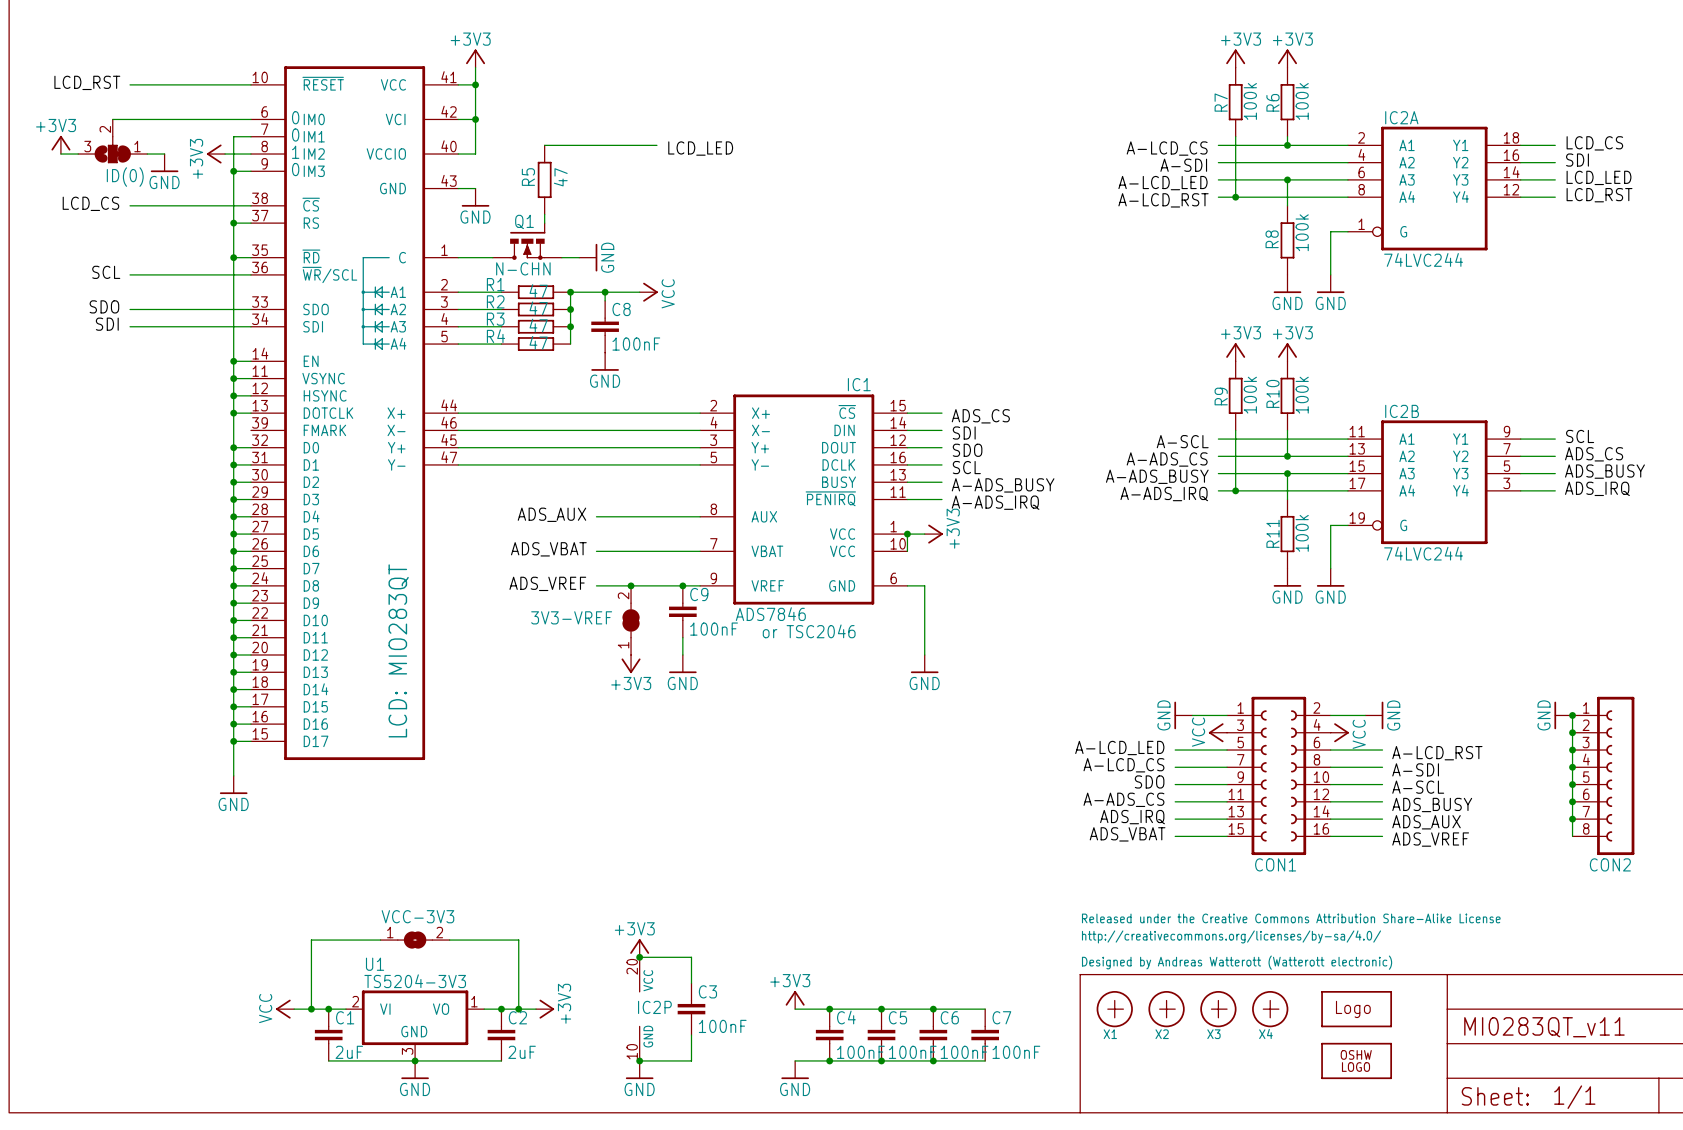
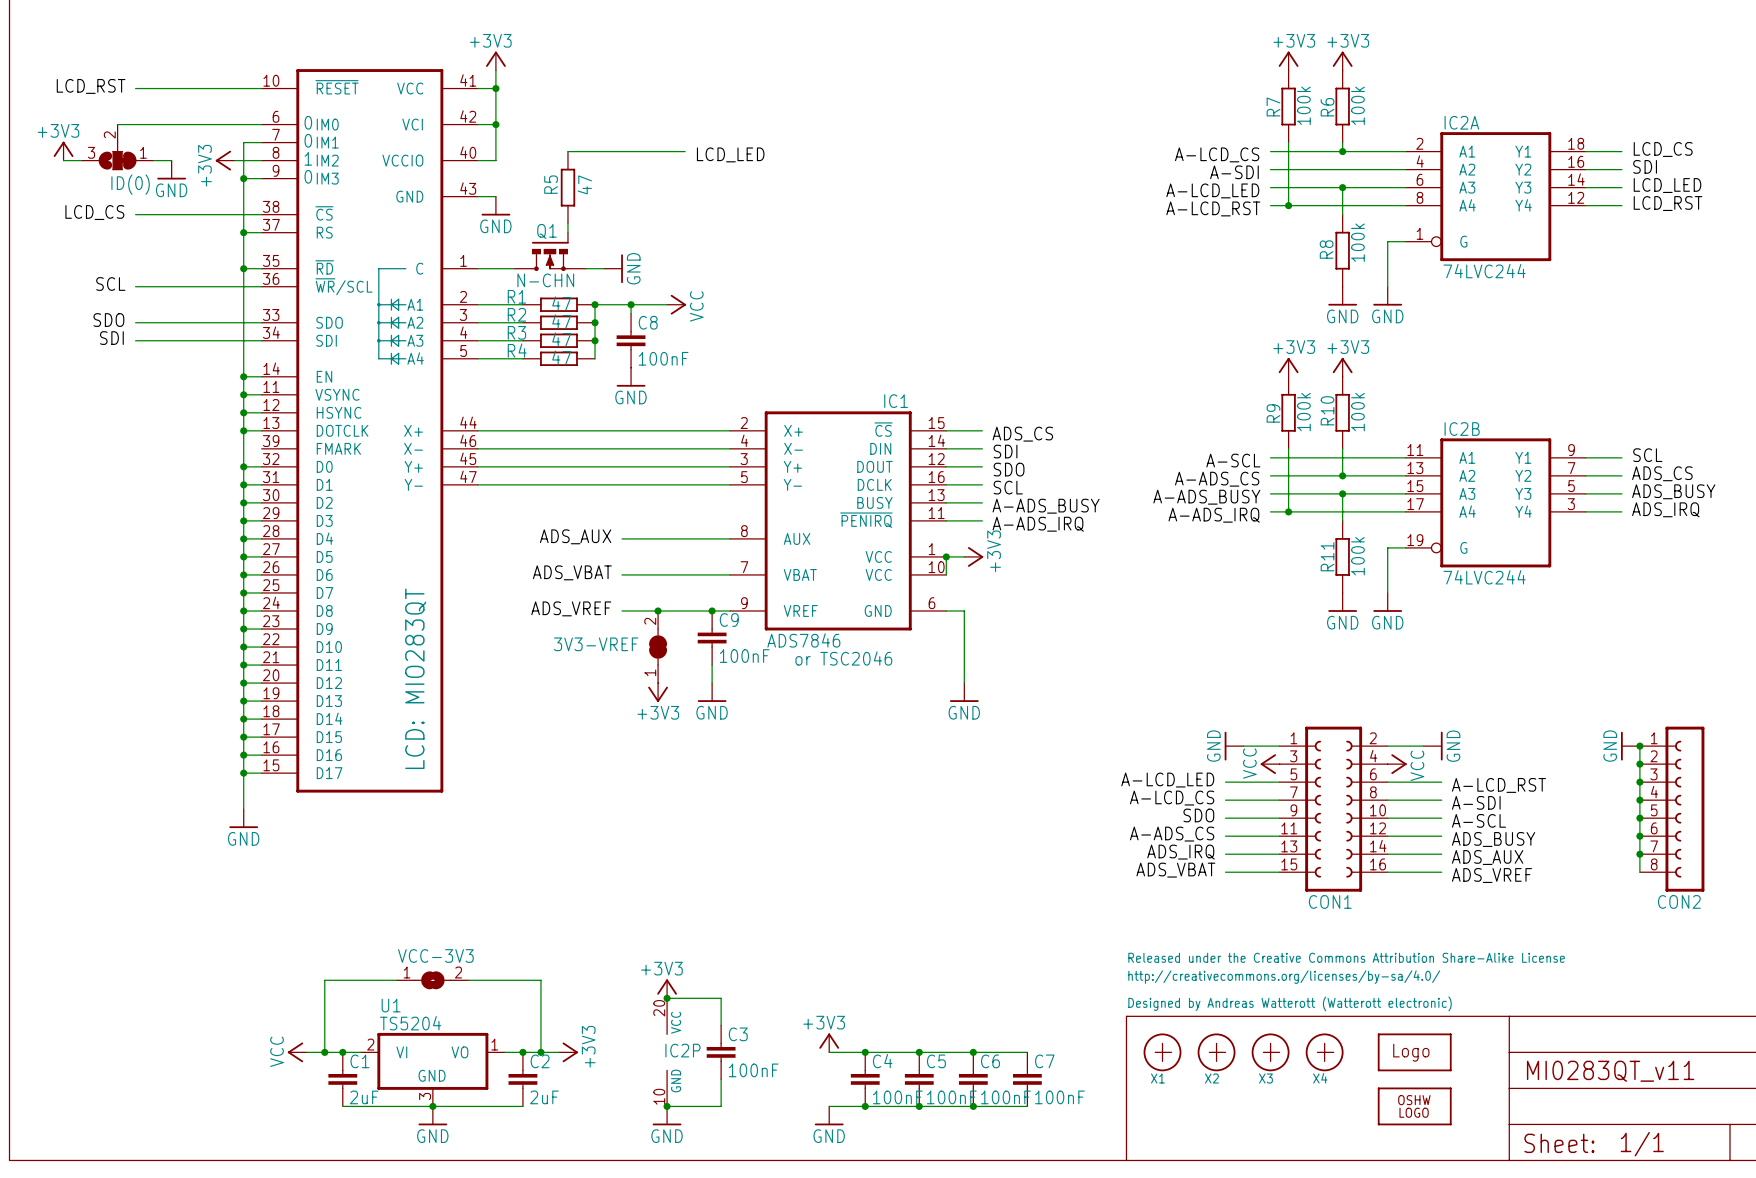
U1 value: TS5204-3V3 (415, 981) -> TS5204 (410, 1023)

